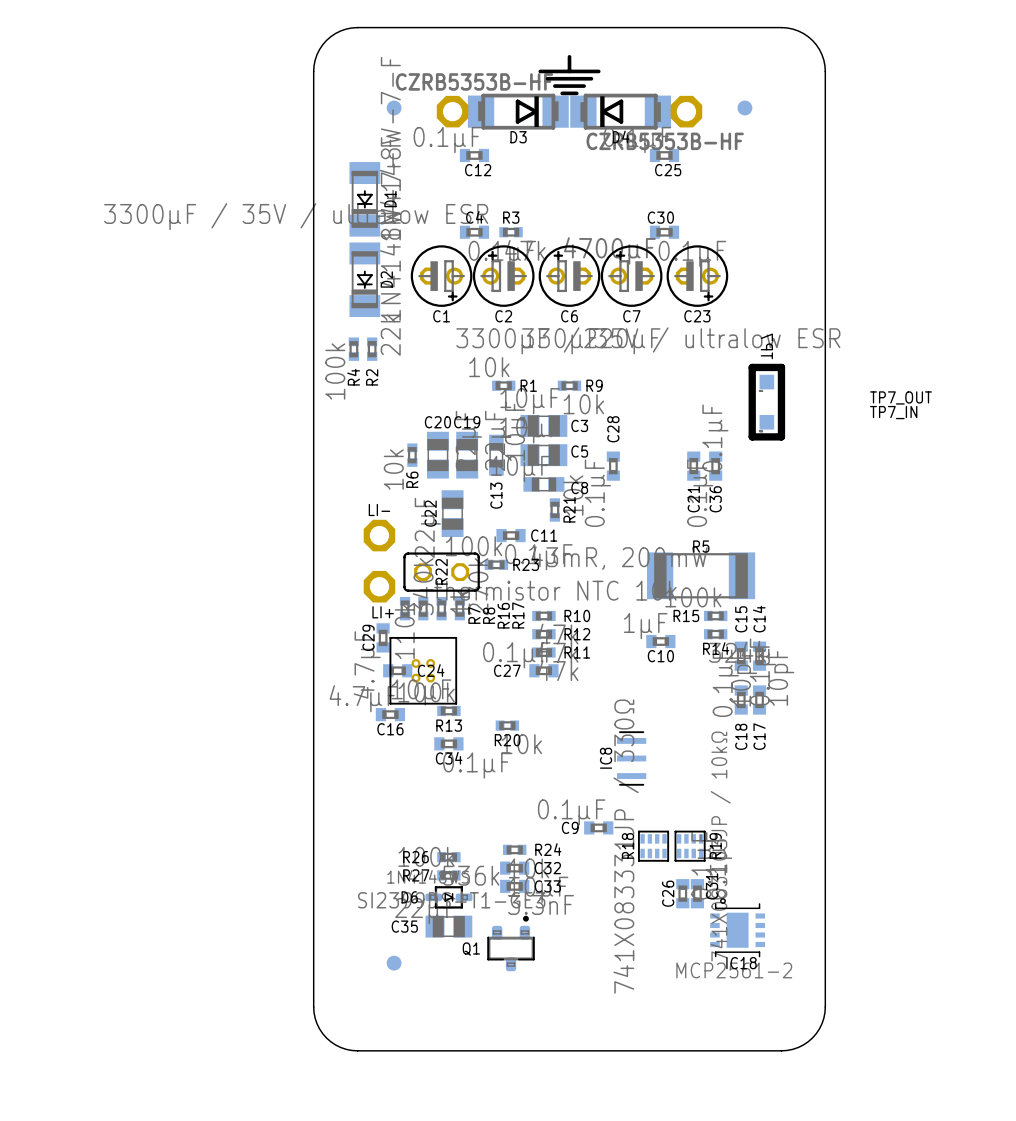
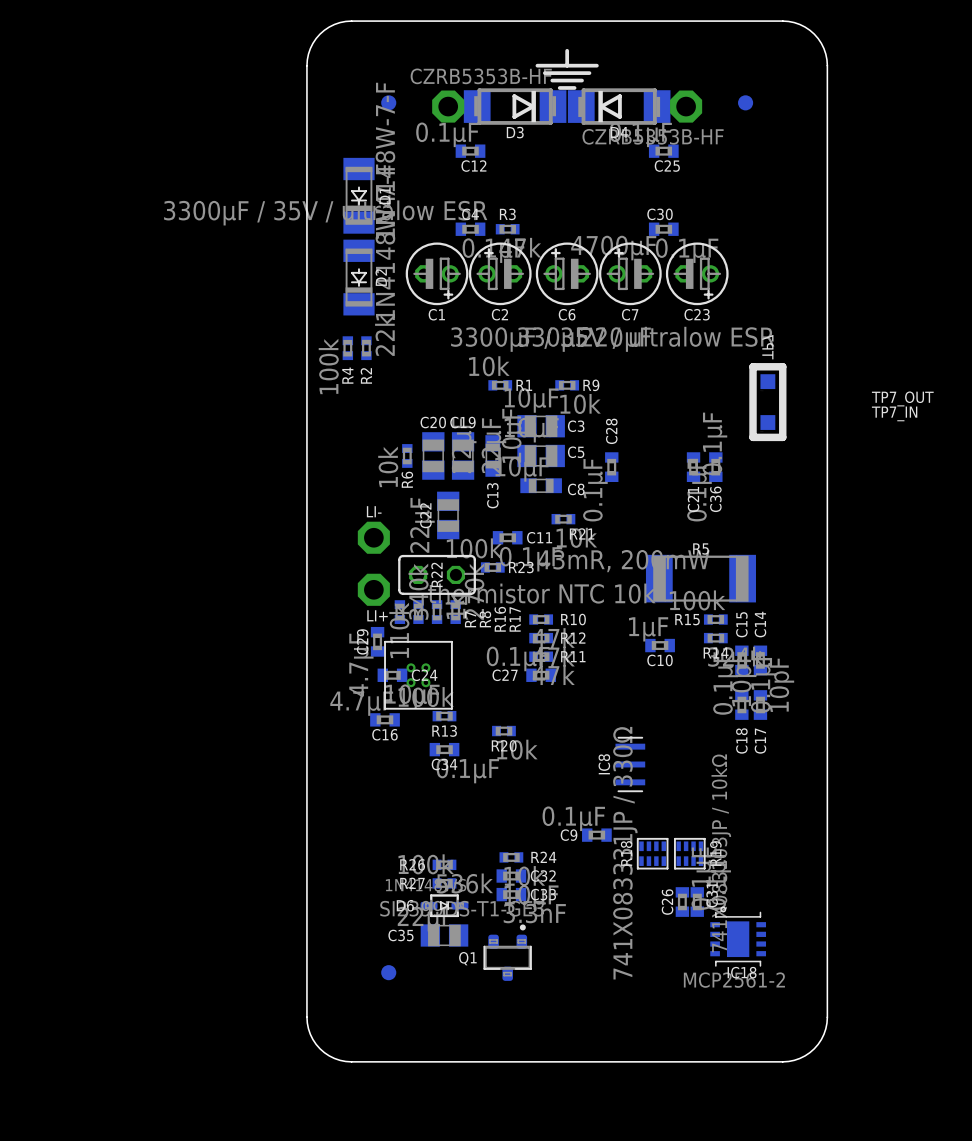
R21 rotation: 0° (554, 509) -> 90° clockwise (563, 519)

